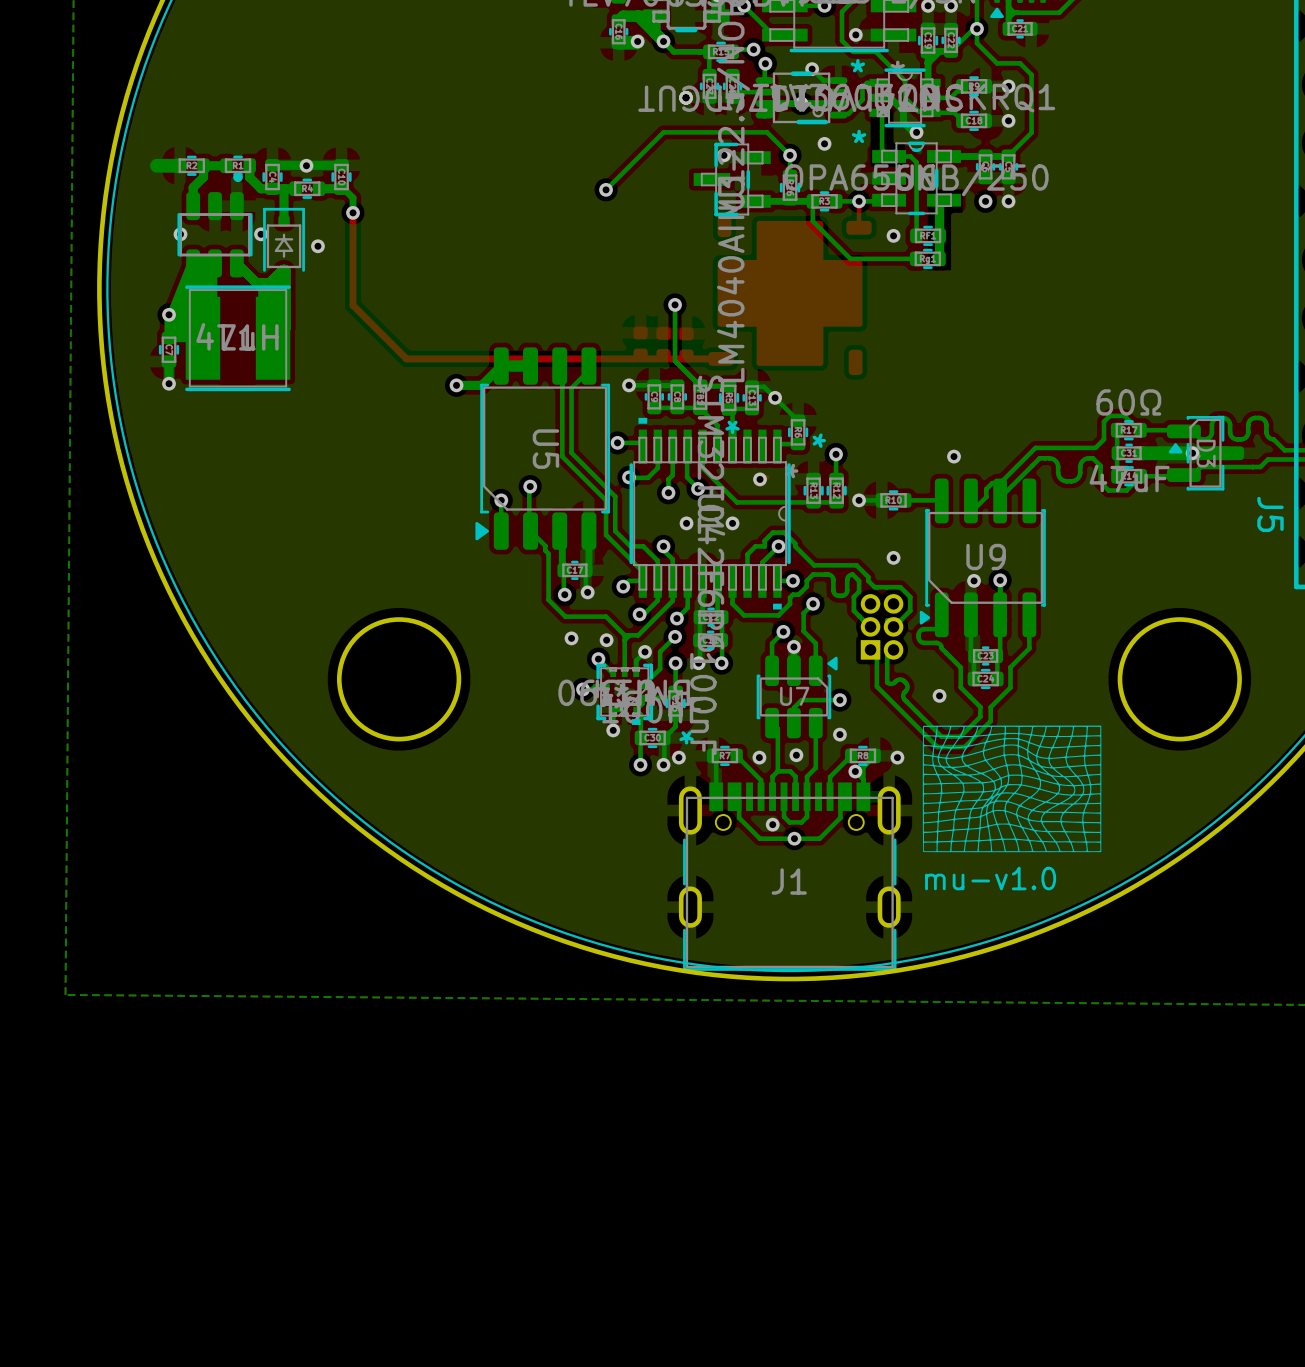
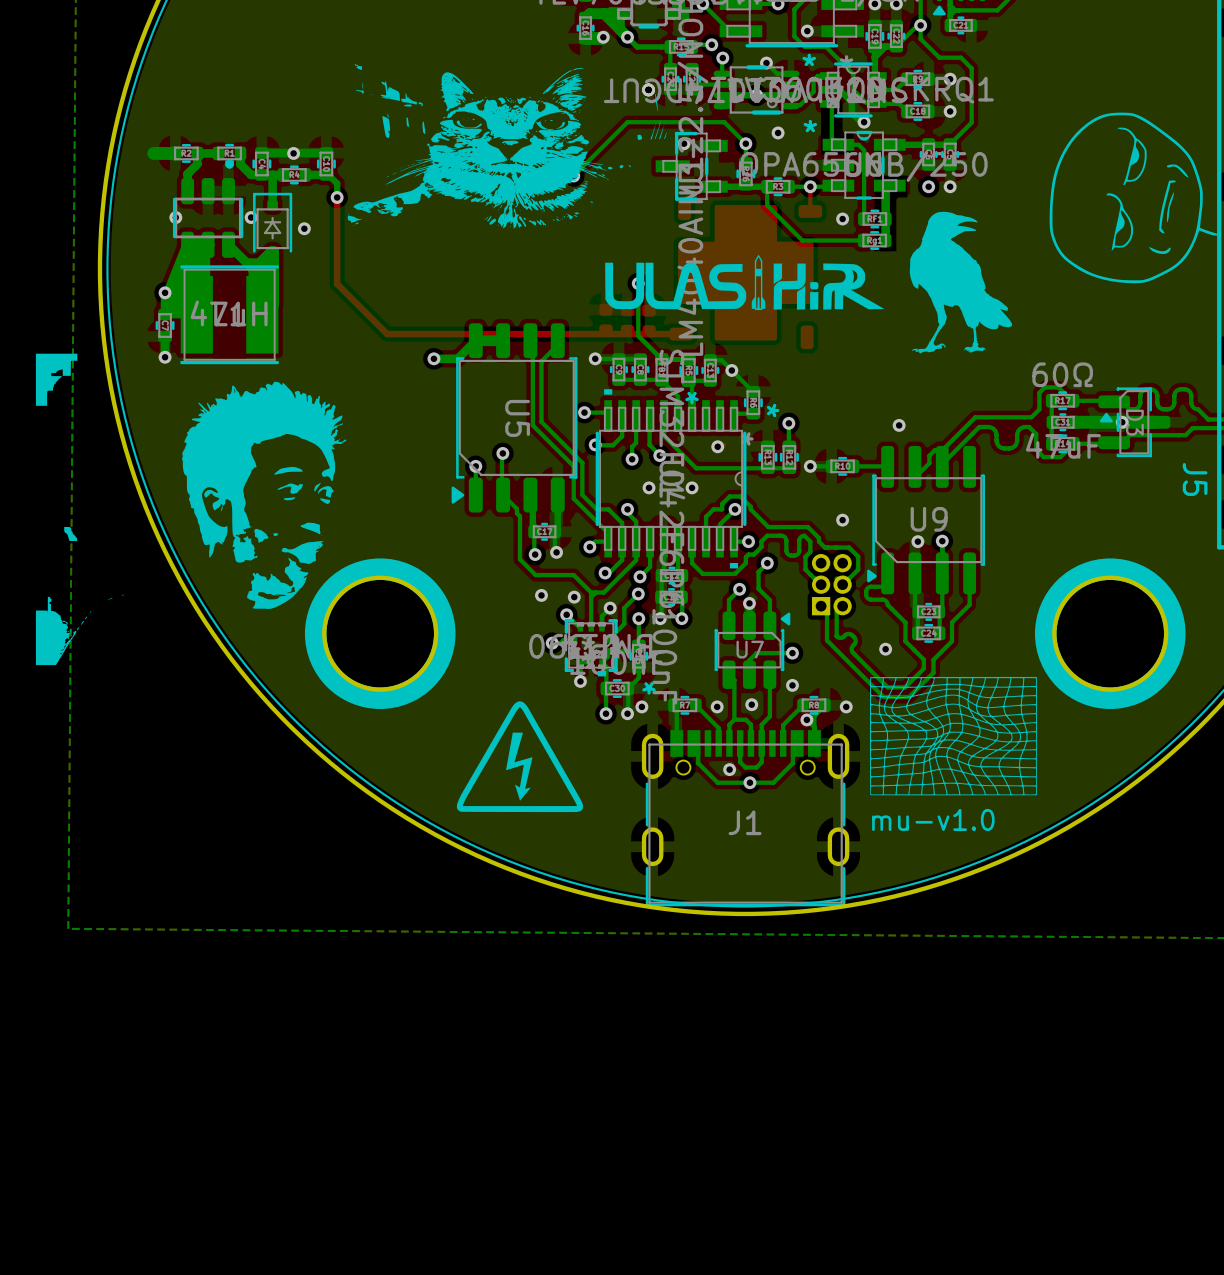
drawing: none -> [347, 63, 1012, 354]
drawing: none -> [1049, 112, 1218, 284]
drawing: none -> [35, 353, 584, 813]
drawing: none -> [1034, 558, 1186, 709]

